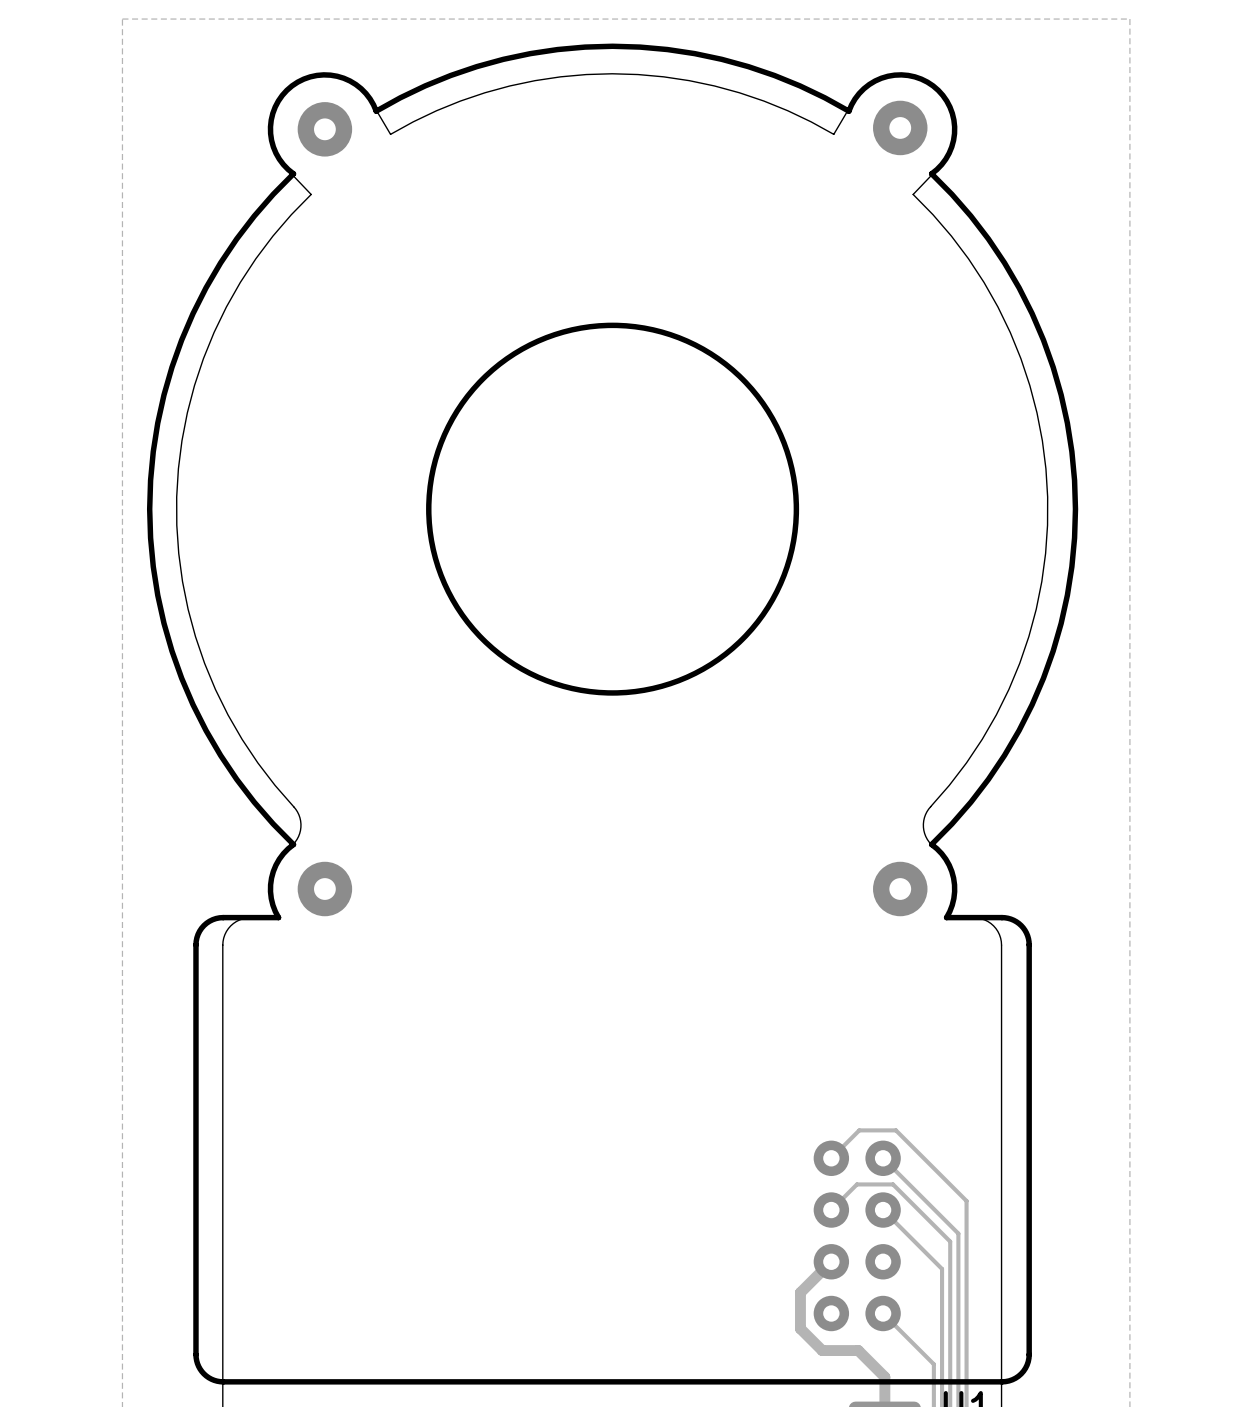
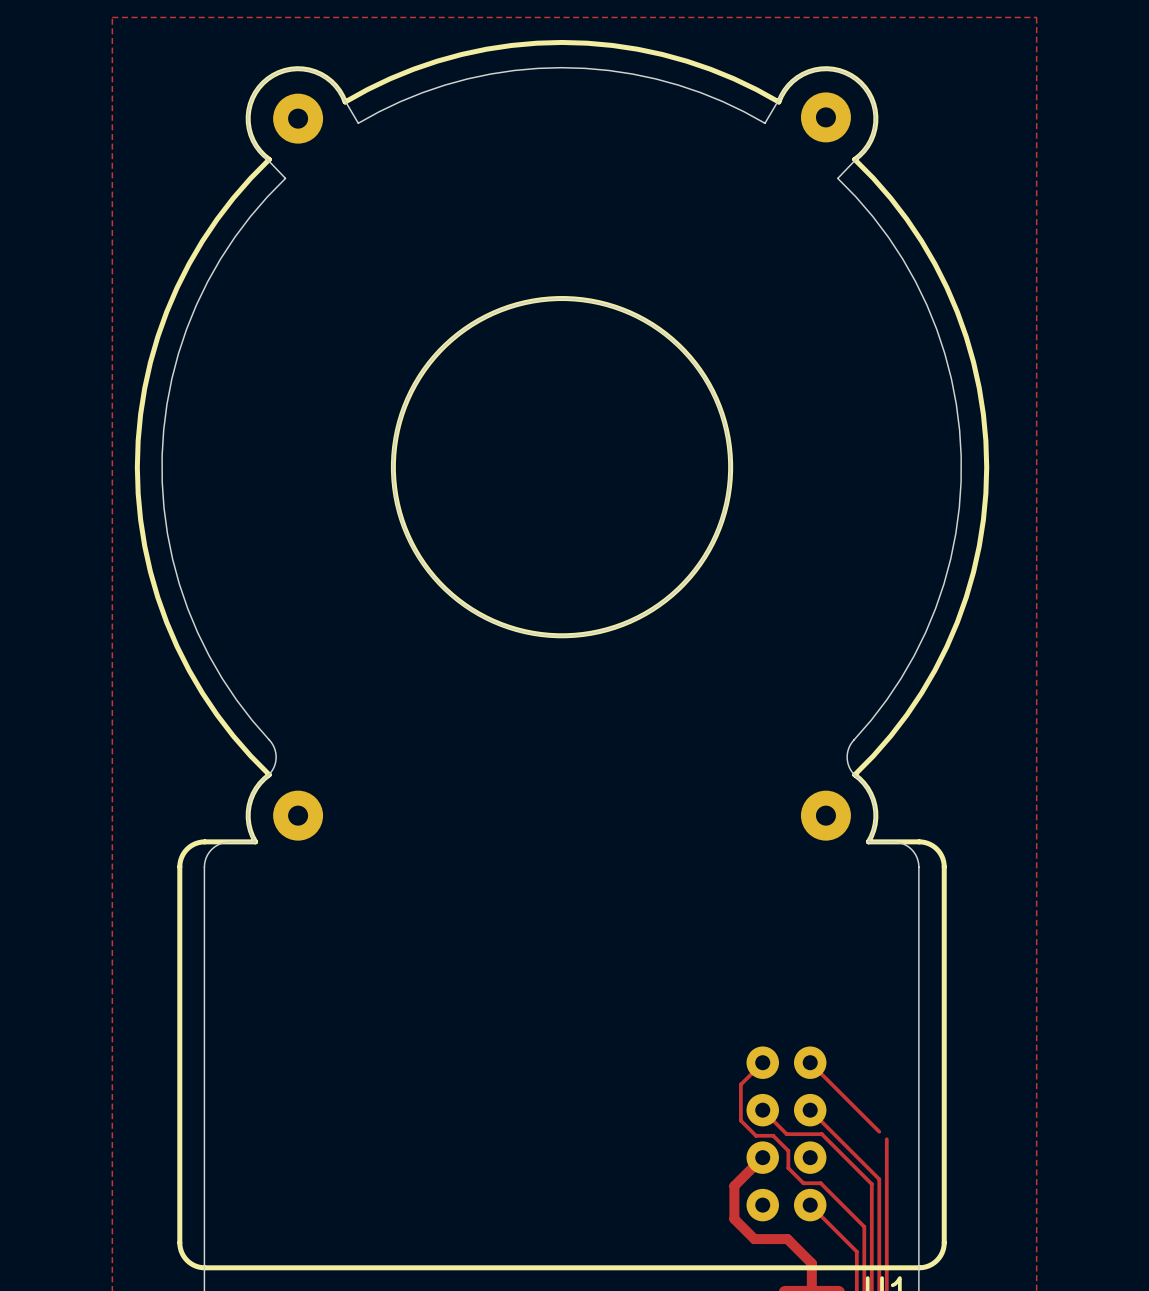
track: (831, 1158) (859, 1130) (895, 1130) (966, 1200) (966, 1241) -> (762, 1062) (740, 1084) (740, 1120) (756, 1135) (773, 1135) (788, 1150) (788, 1168) (803, 1183) (820, 1183) (864, 1226)
track: (831, 1210) (856, 1184) (893, 1184) (950, 1241) (950, 1290) -> (762, 1110) (786, 1134) (821, 1134) (871, 1184)
track: (958, 1233) (958, 1285) -> (864, 1164) (879, 1179)
track: (942, 1268) (942, 1337) -> none

